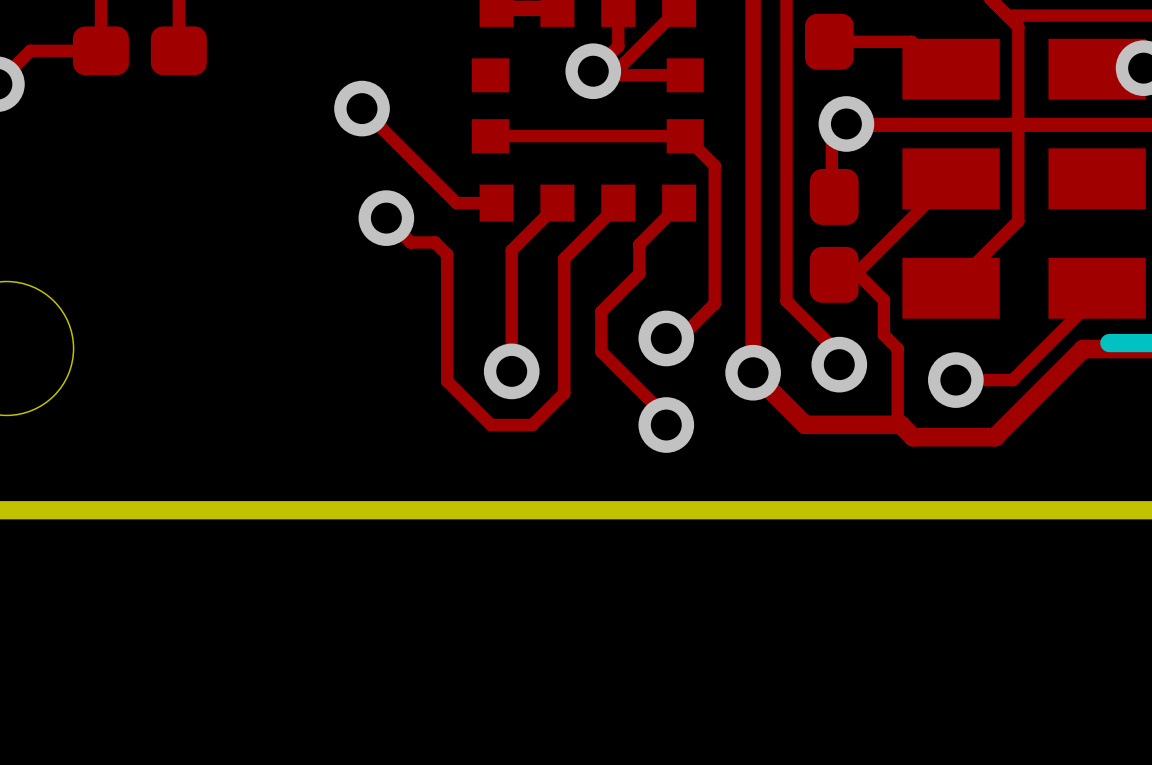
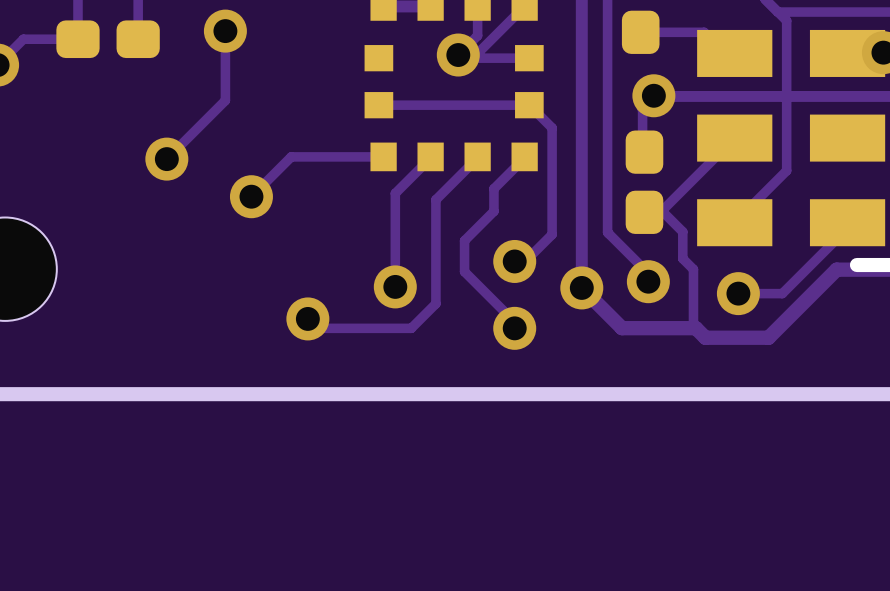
track: none -> (225, 31) (225, 100) (166, 159)
via: none -> (225, 31)
track: (362, 108) (456, 203) -> (251, 196) (291, 156) (352, 156)
via: (362, 108) -> none
via: none -> (166, 159)
track: (386, 218) (410, 242) (435, 242) (447, 254) (447, 381) (491, 425) -> (307, 318) (317, 328) (379, 328)
via position: (386, 218) -> (251, 196)
via: none -> (307, 318)

